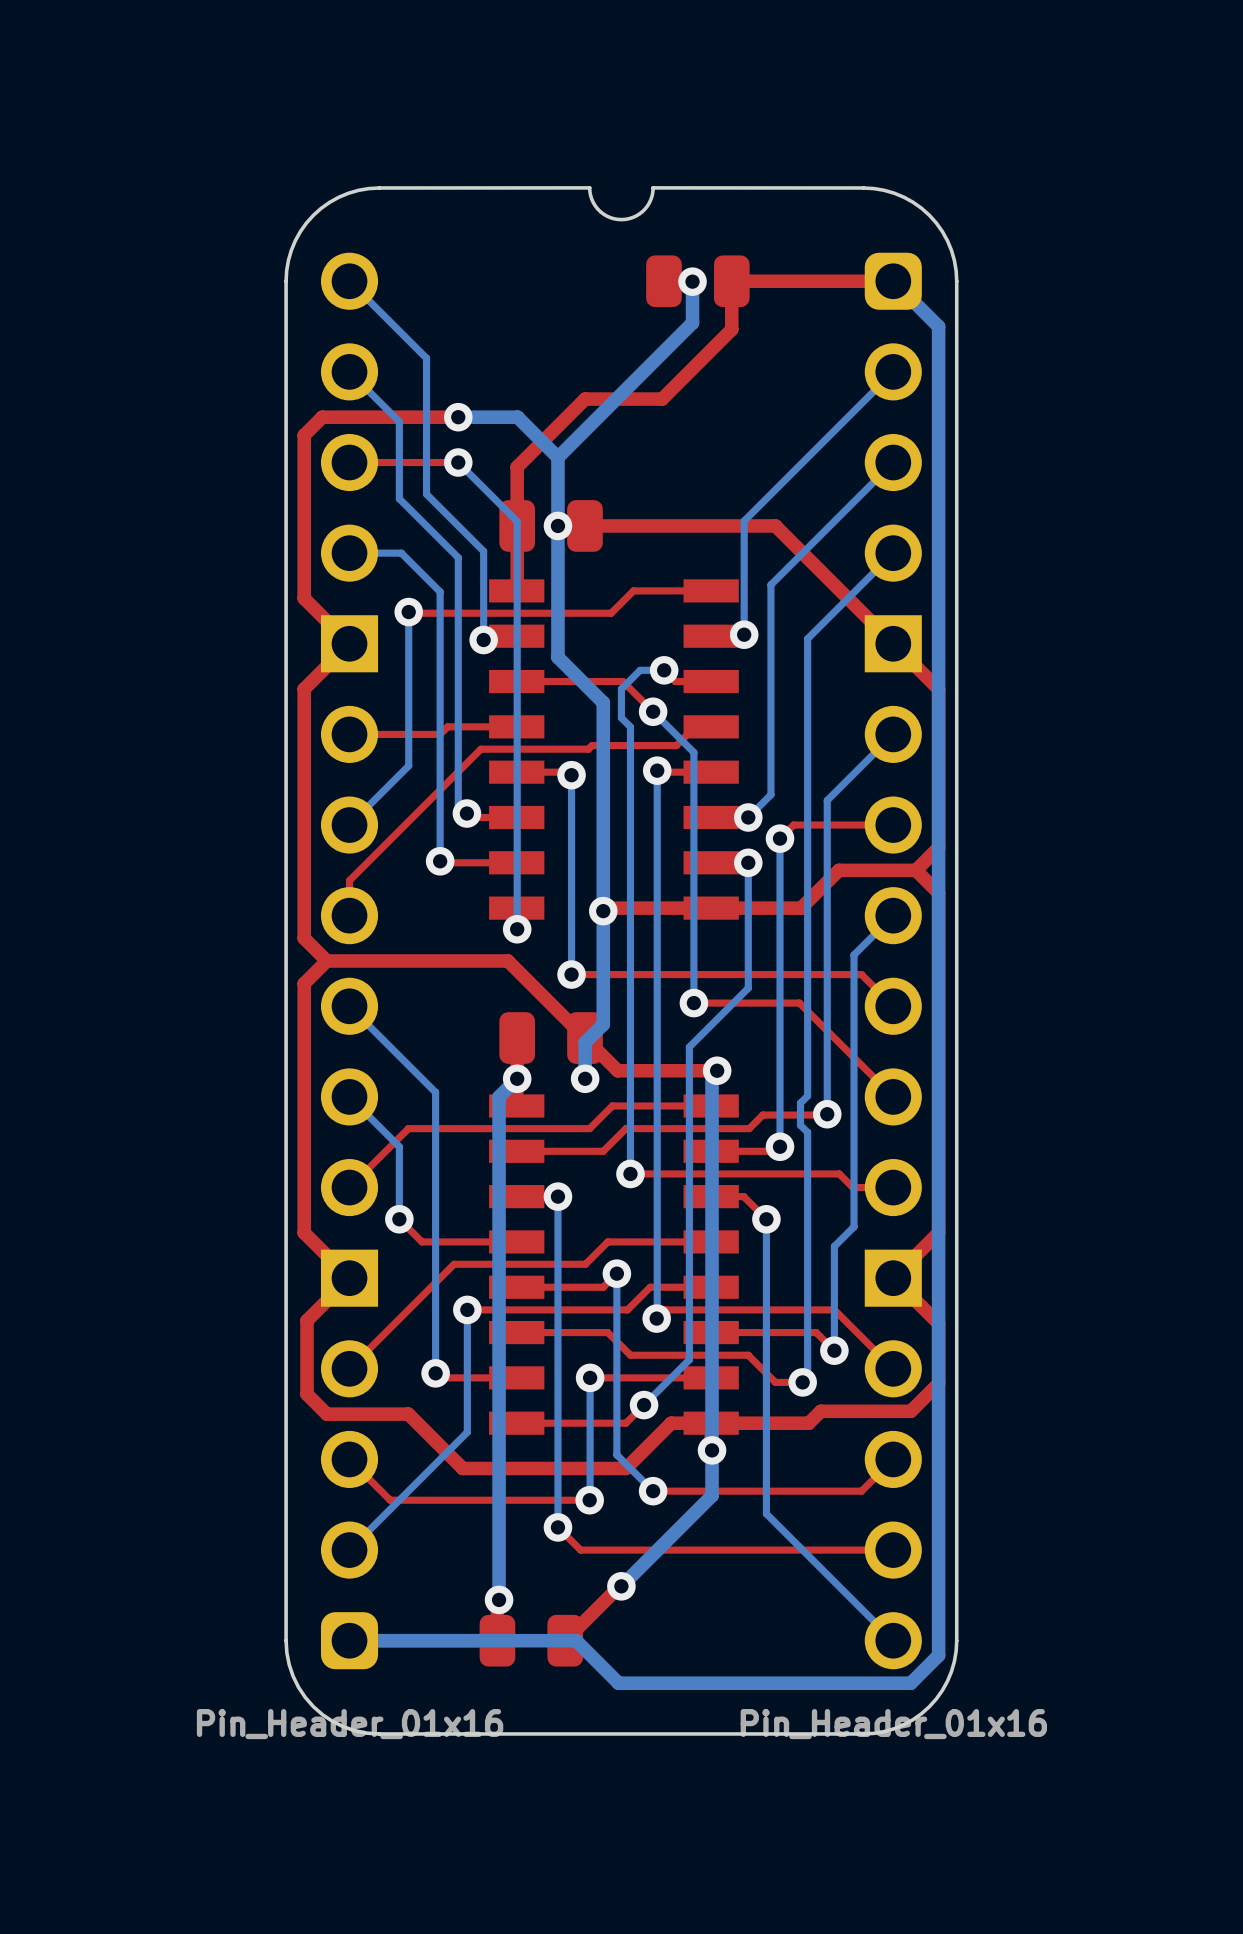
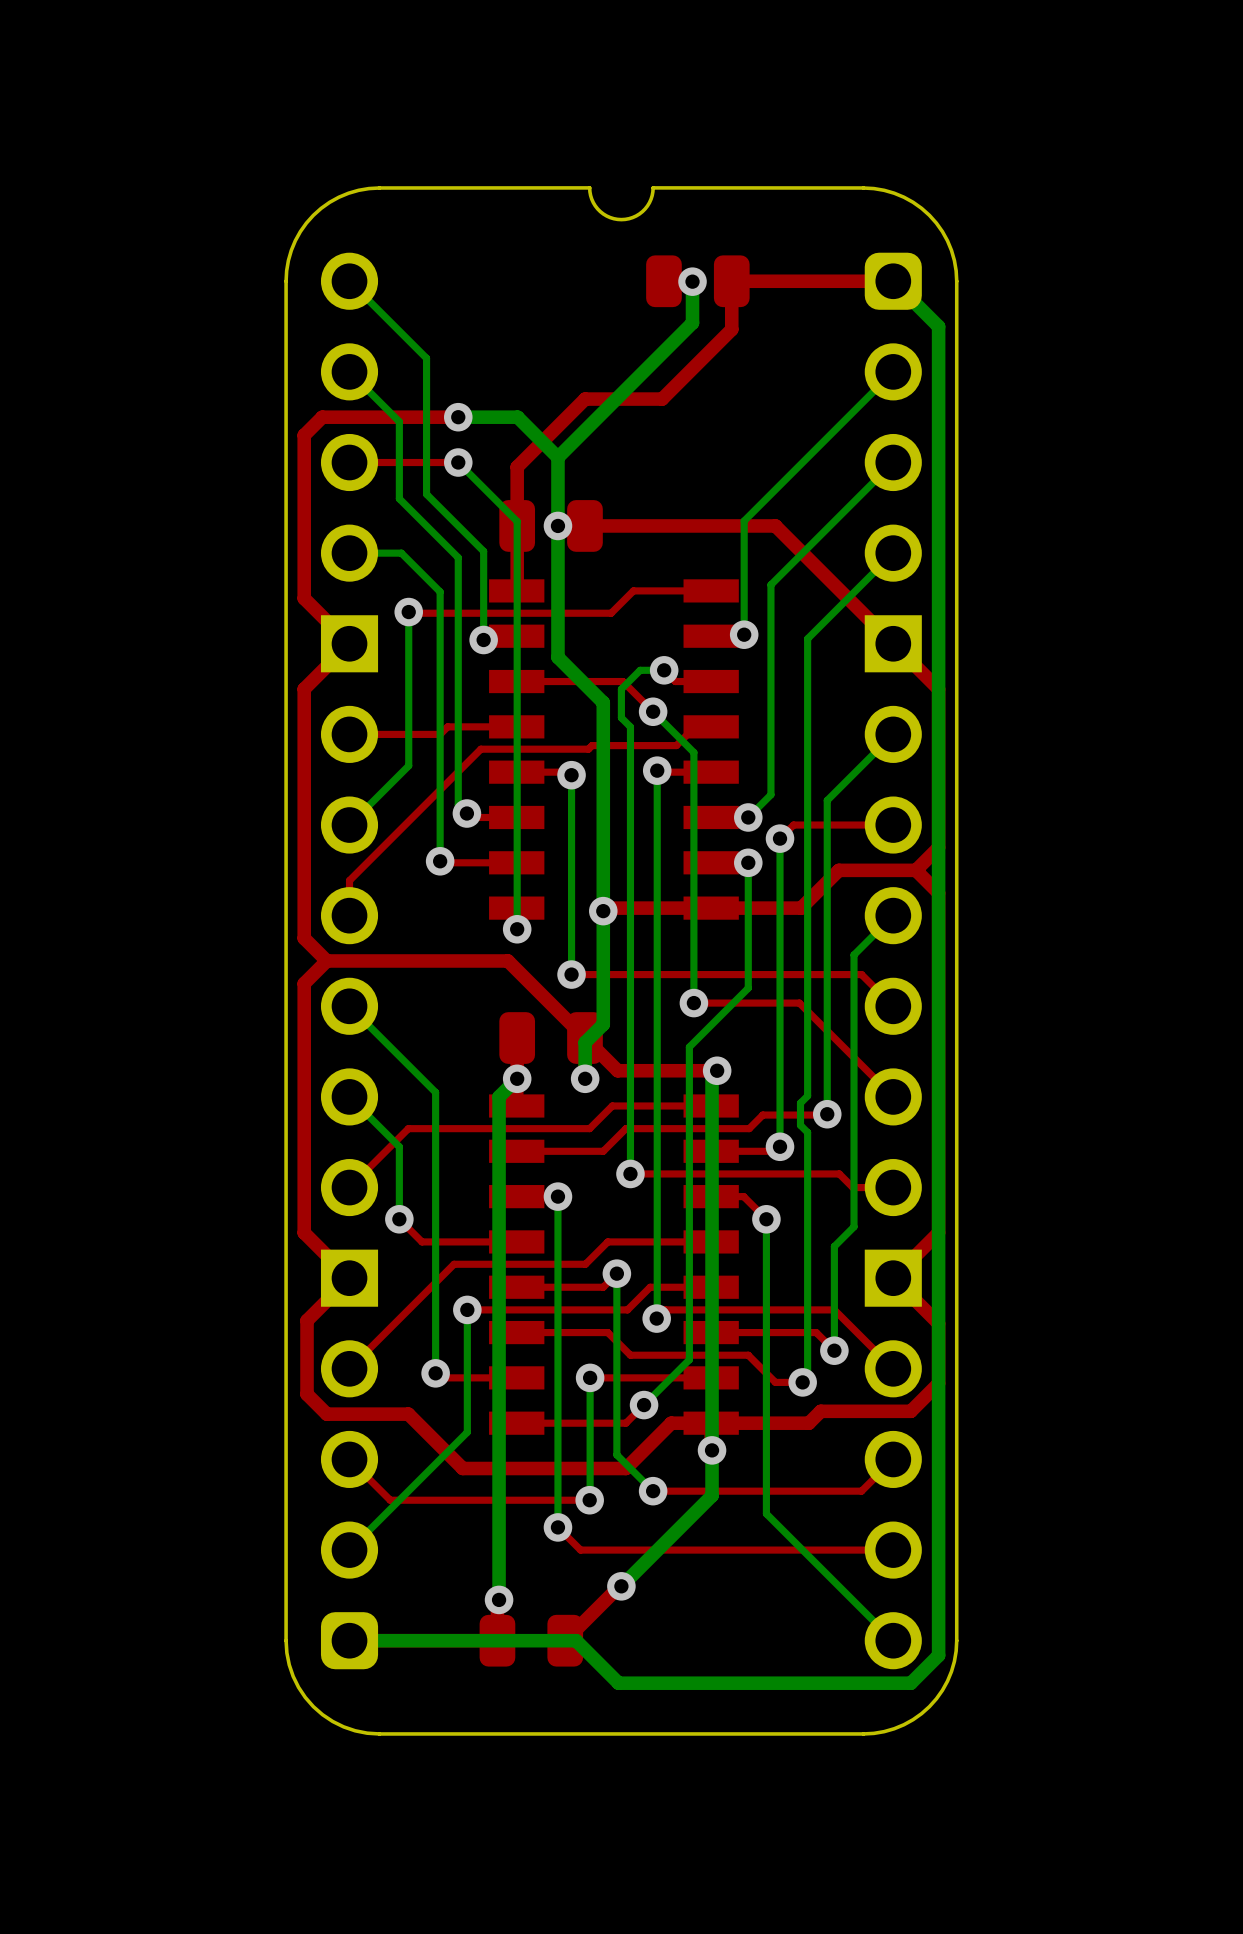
drawing: [196, 1708, 504, 1740] -> none
drawing: [740, 1708, 1048, 1740] -> none

